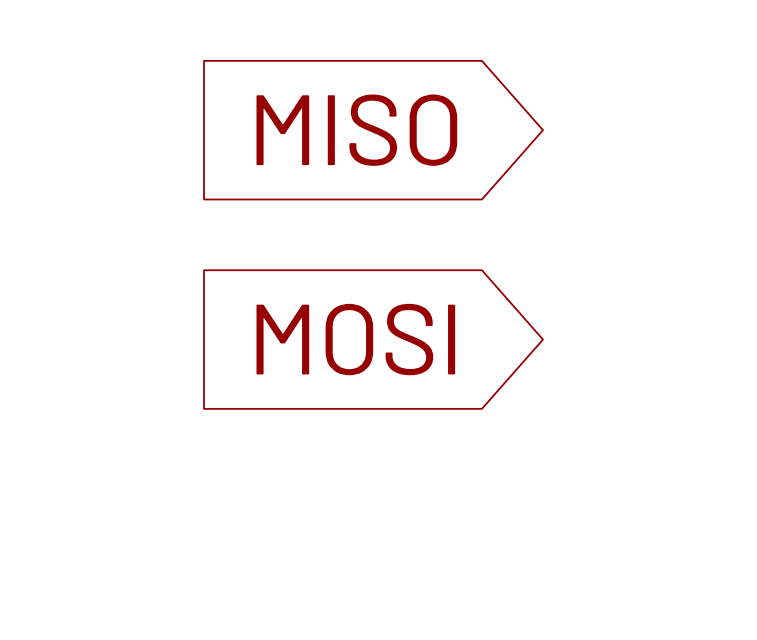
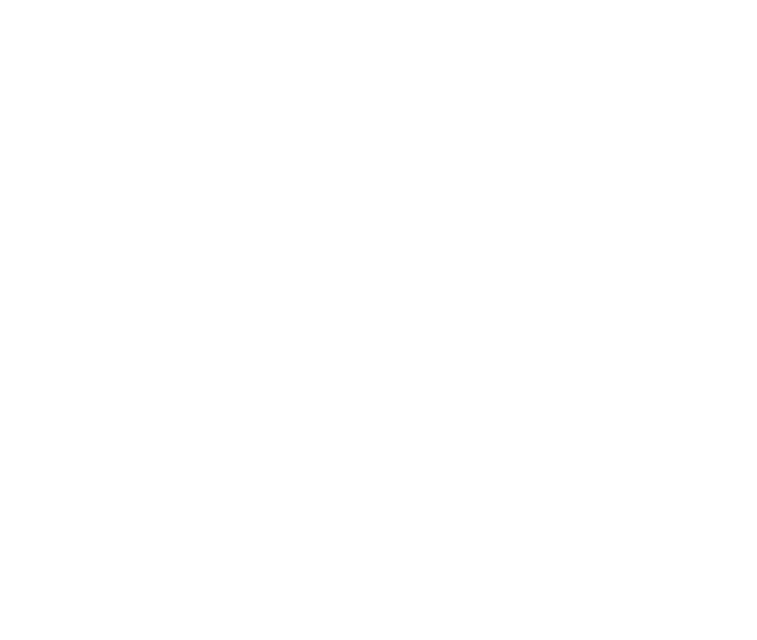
global label: MISO (356, 130) -> none
global label: MOSI (355, 339) -> none

